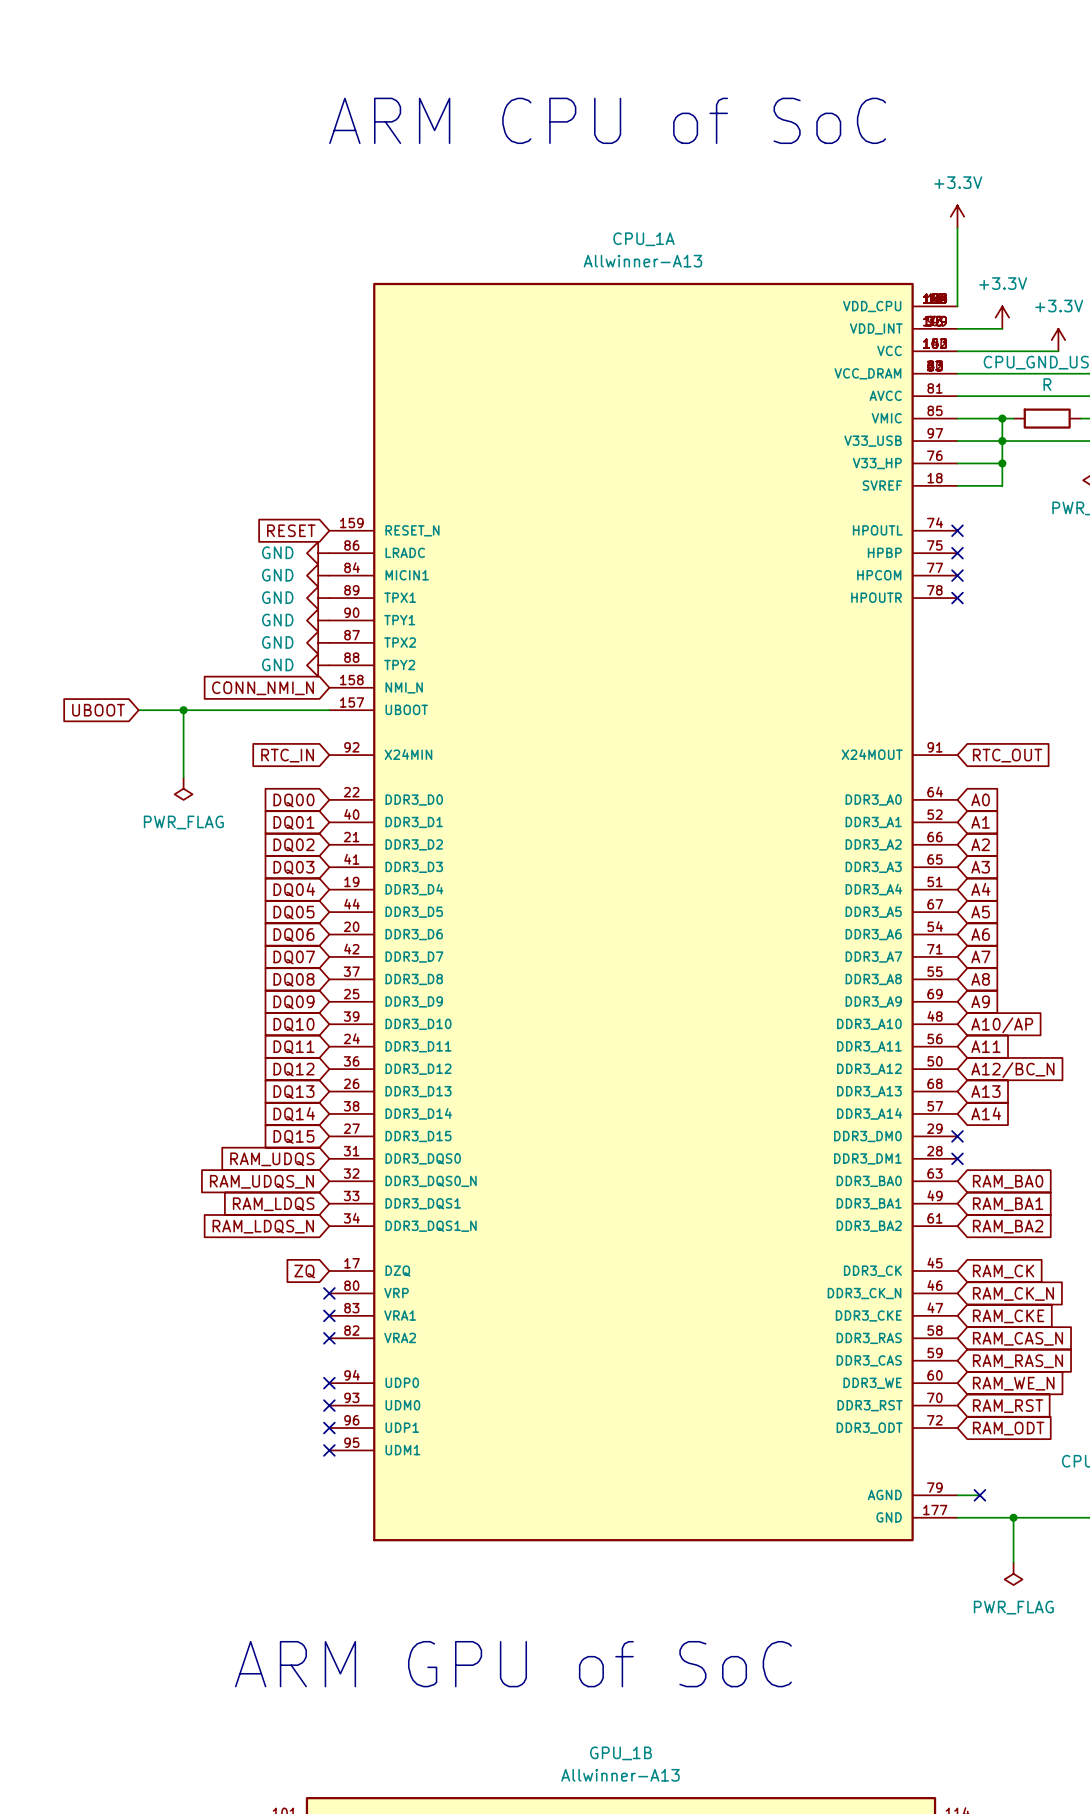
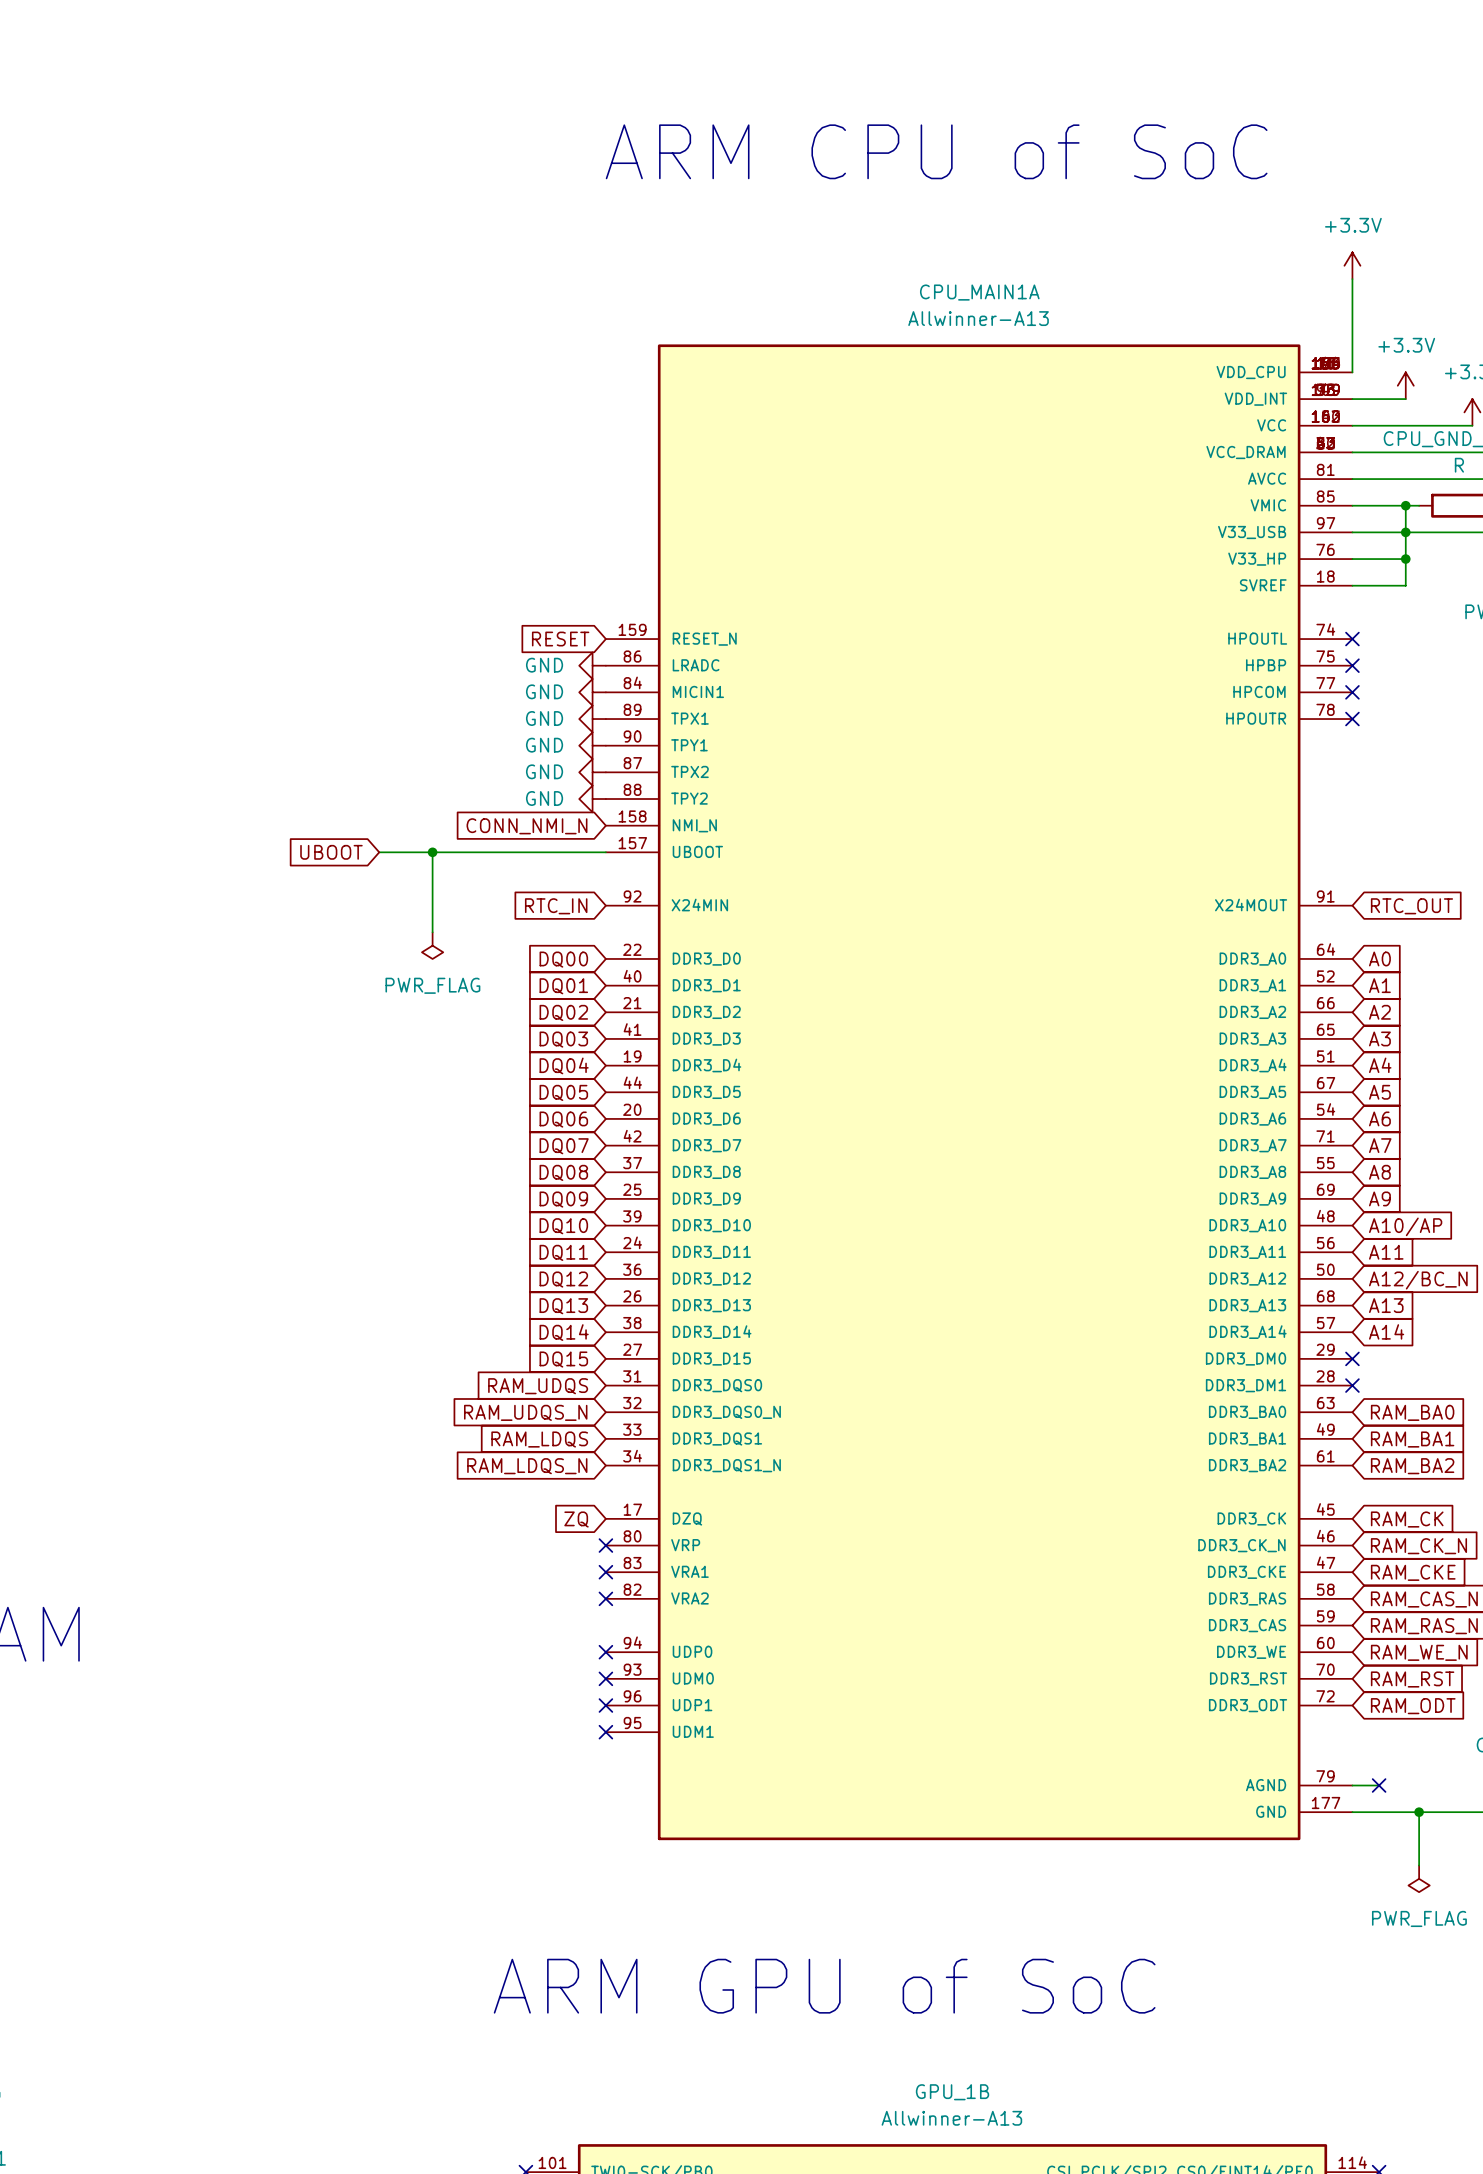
CPU_1A name: CPU_1A (643, 239) -> CPU_MAIN1A (979, 292)

